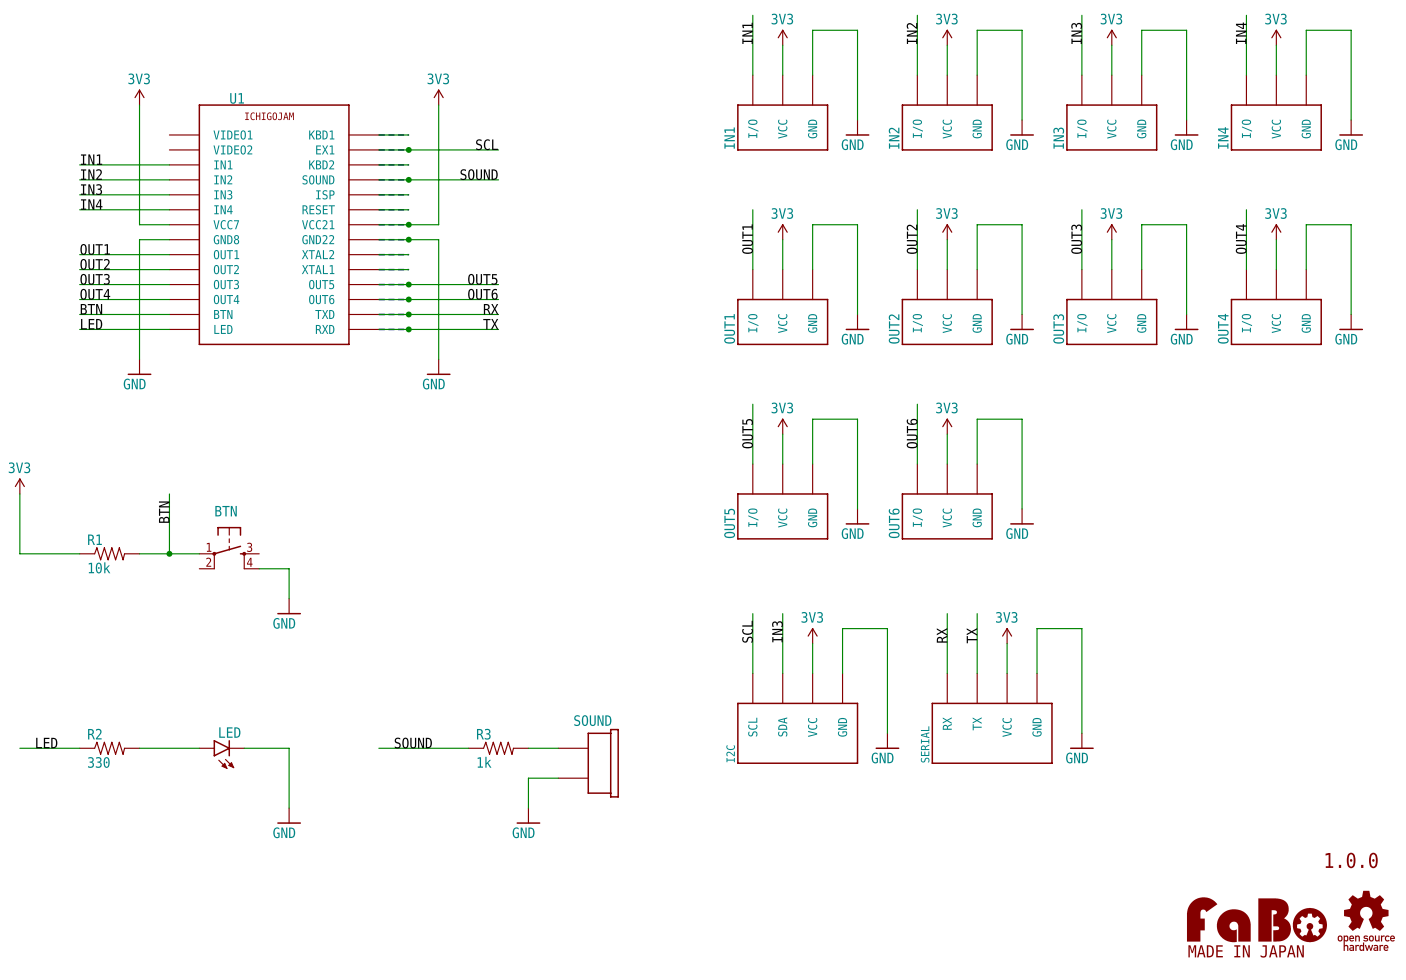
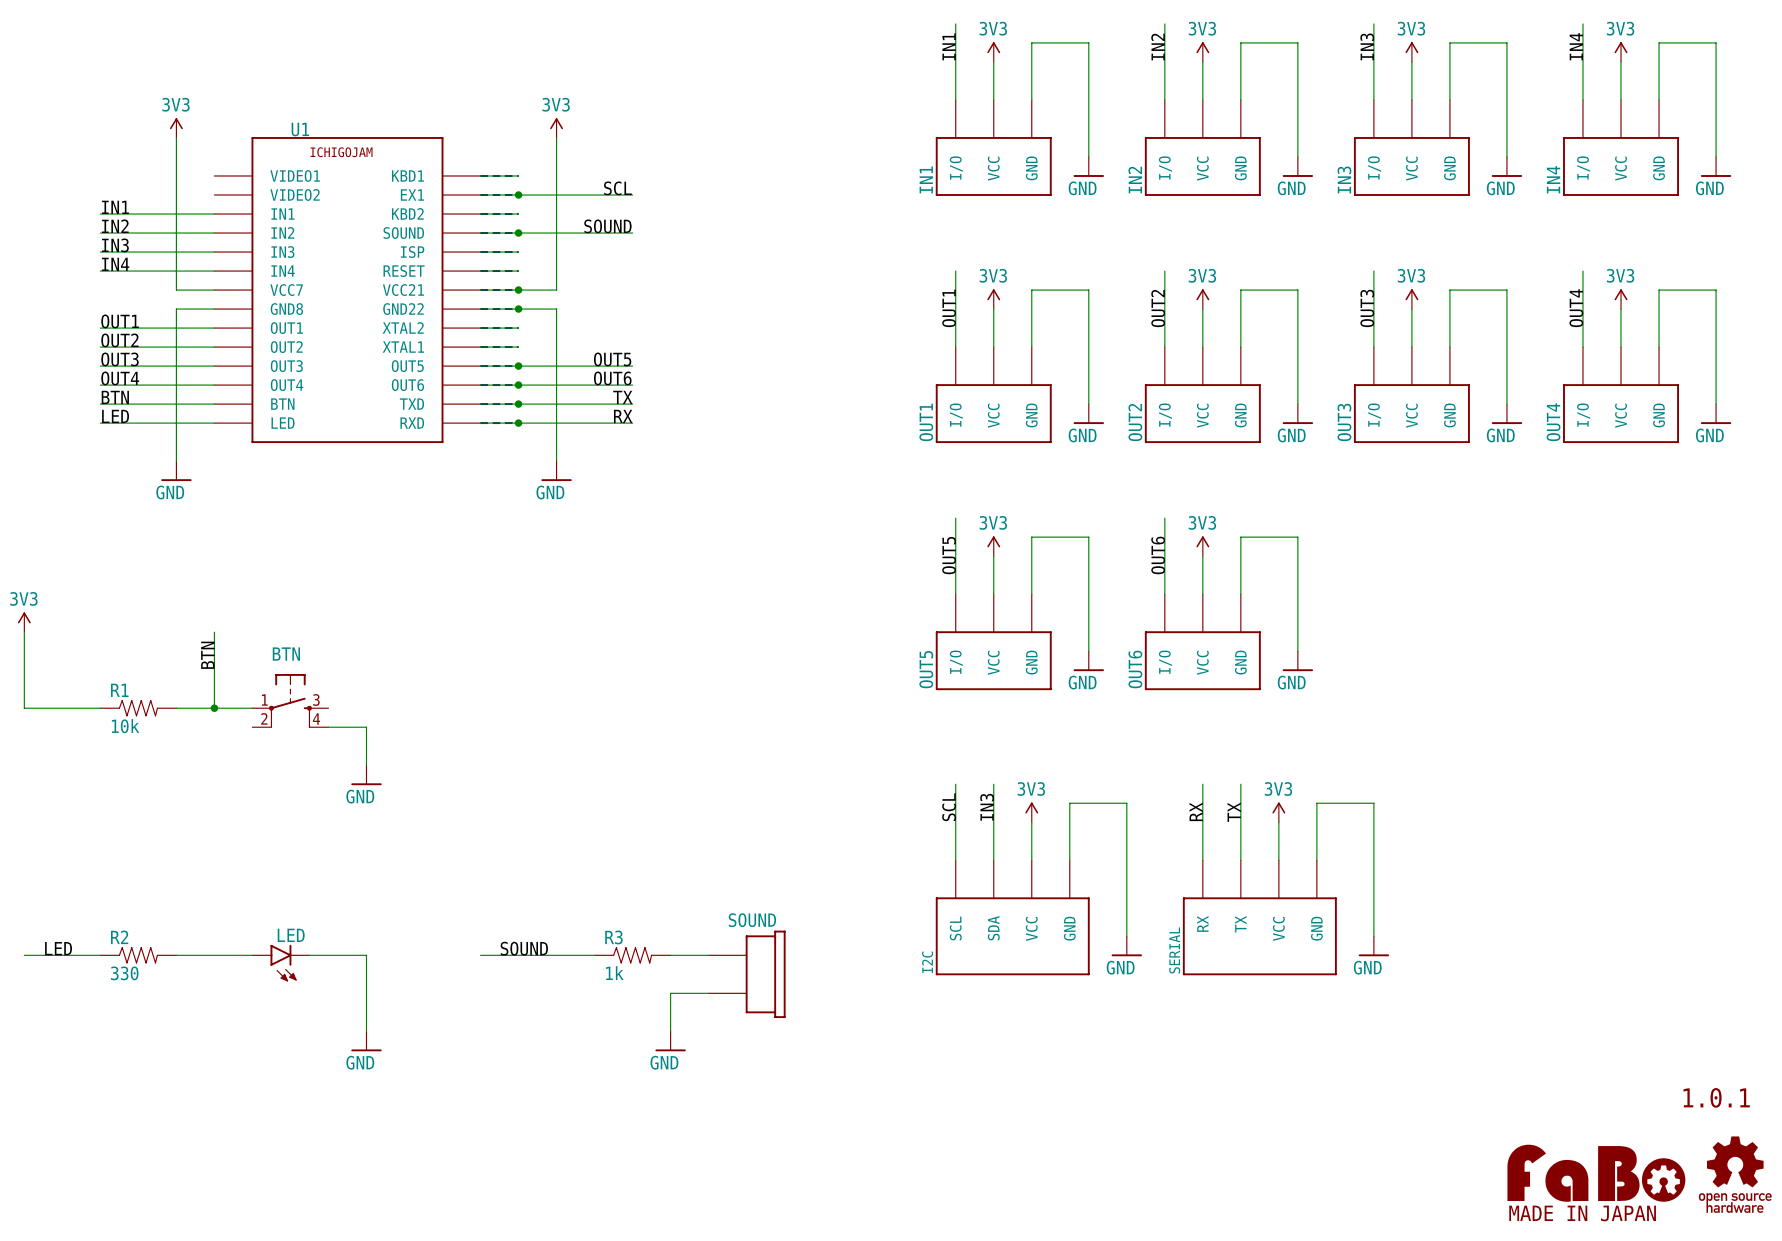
label: RX (491, 309) -> TX (622, 397)
label: TX (490, 324) -> RX (623, 416)
text: 1.0.0 (1351, 860) -> 1.0.1 (1716, 1097)

